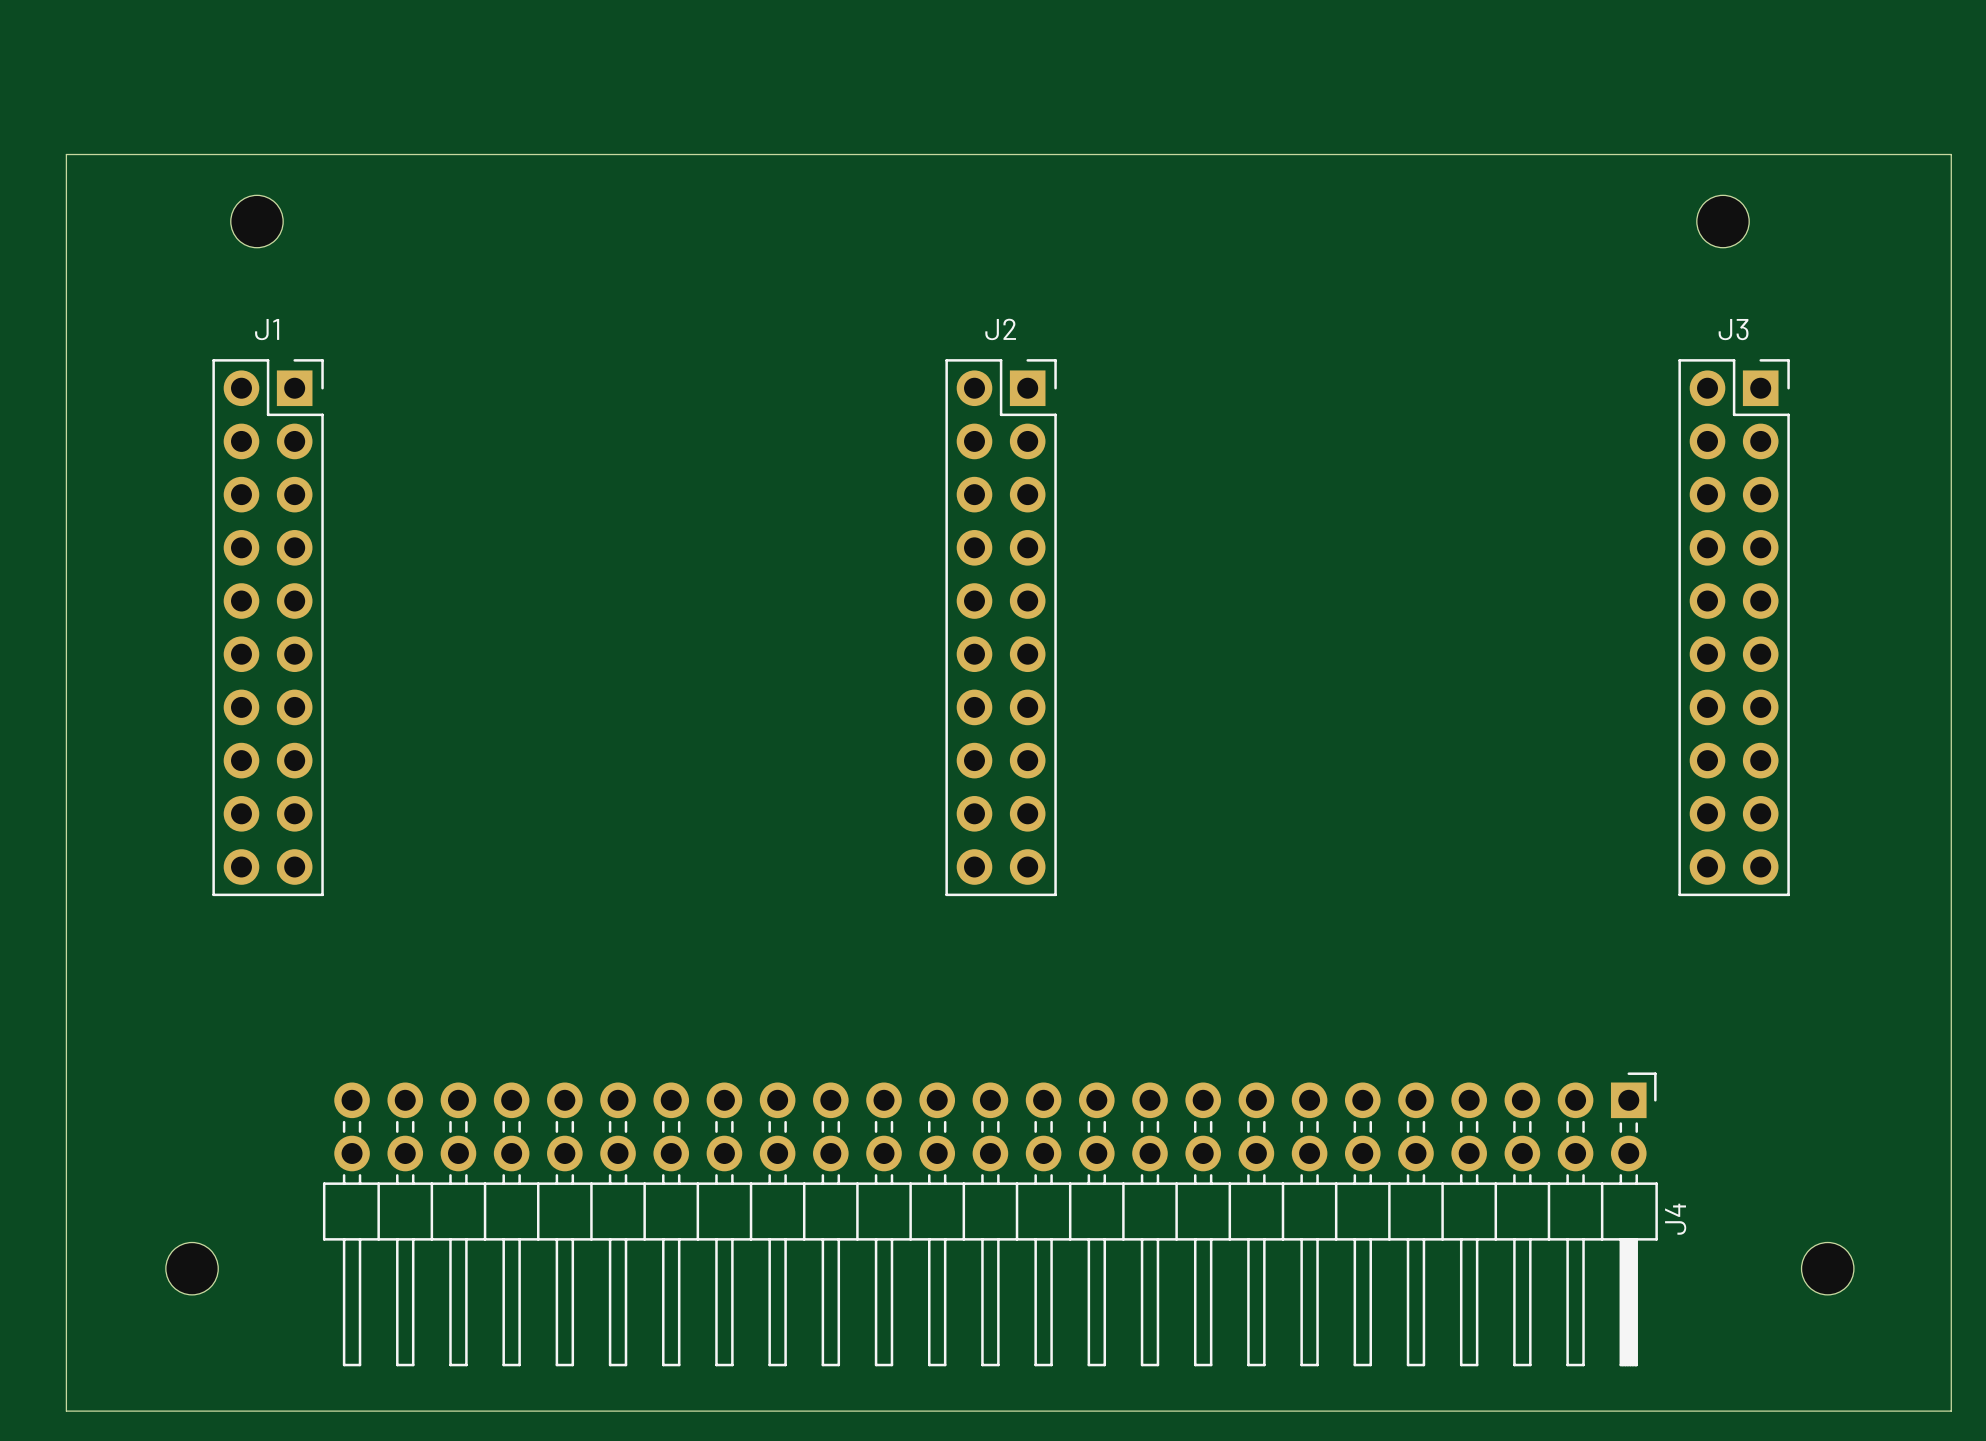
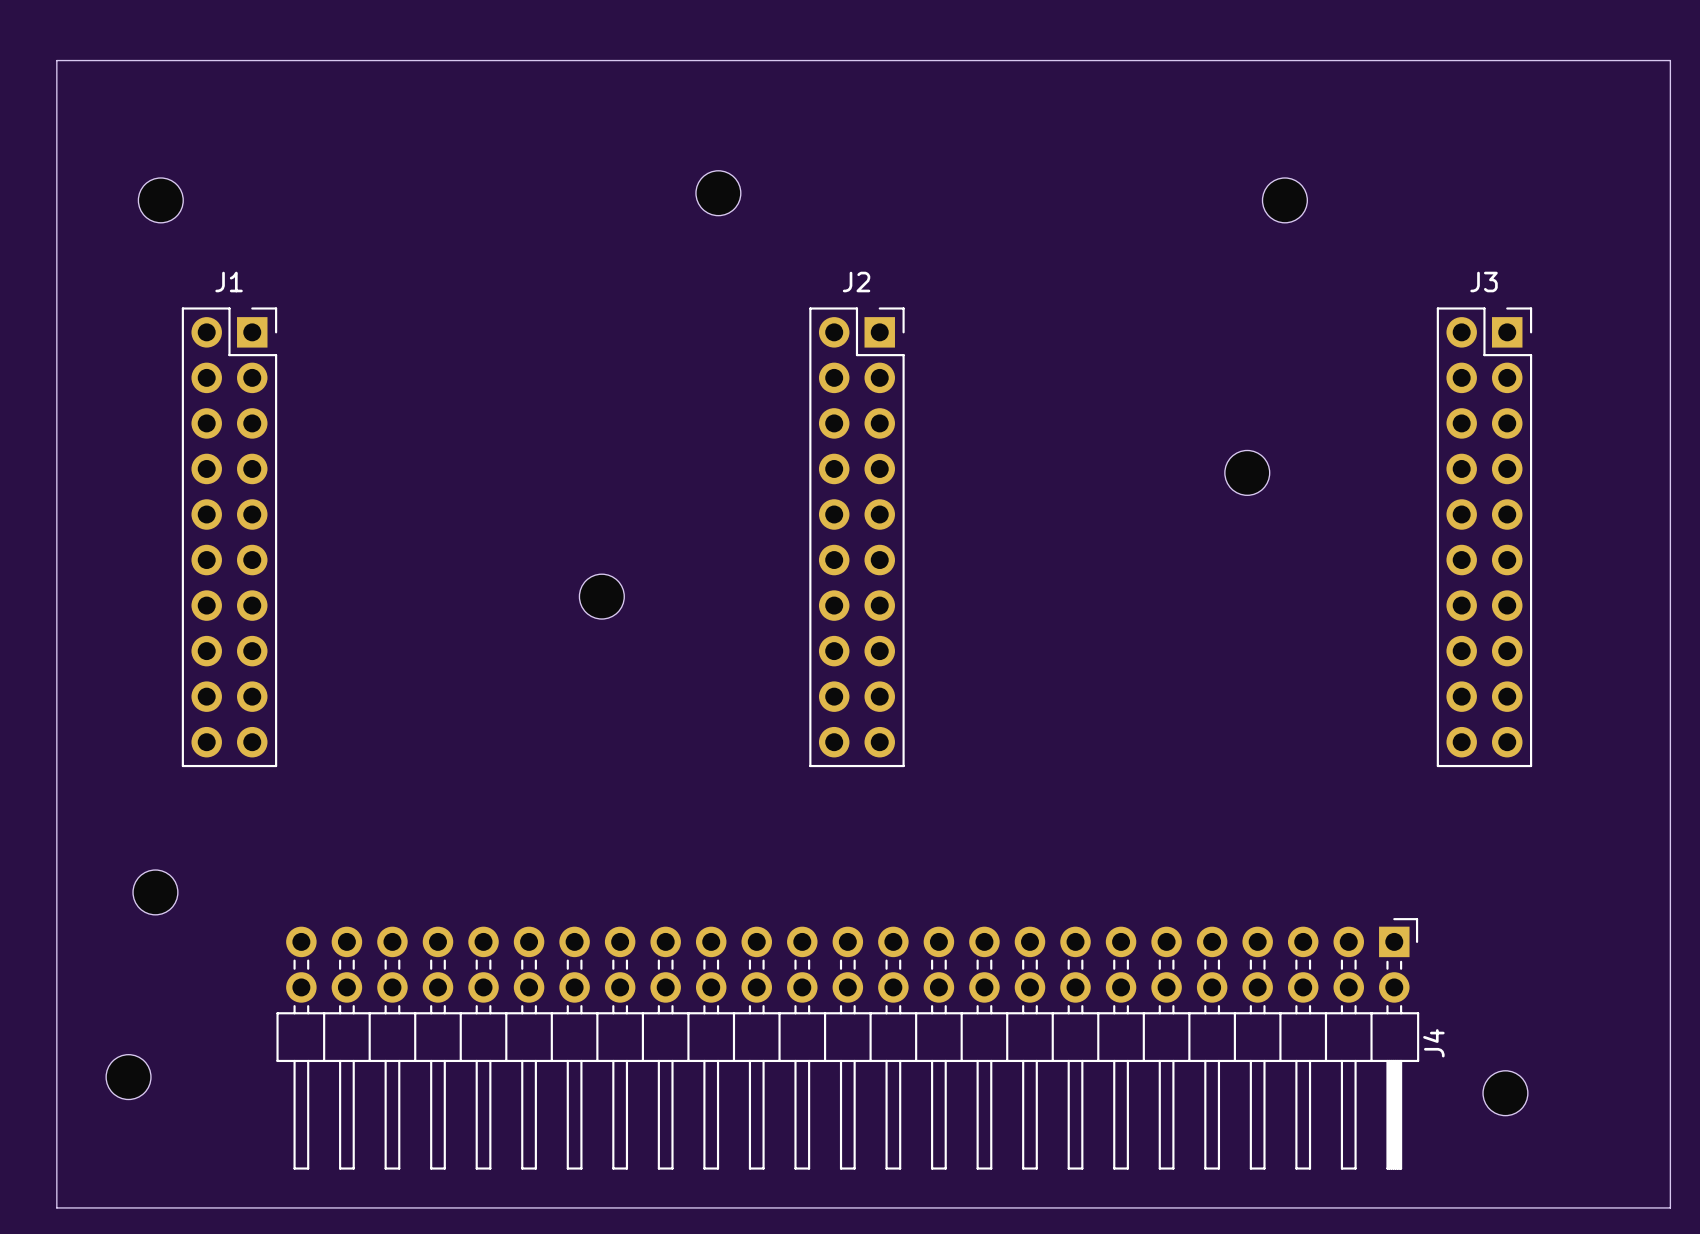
board edge: (66, 154) (1951, 154) -> (56, 132) (56, 60) (1670, 60) (1670, 132)
part position: (256, 221) -> (160, 200)
part: (1723, 221) -> none
part: none -> (718, 193)
part: none -> (1284, 200)
part: none -> (1247, 472)
part: none -> (601, 596)
part: none -> (155, 892)
part position: (192, 1268) -> (128, 1077)
part position: (1827, 1268) -> (1505, 1093)

